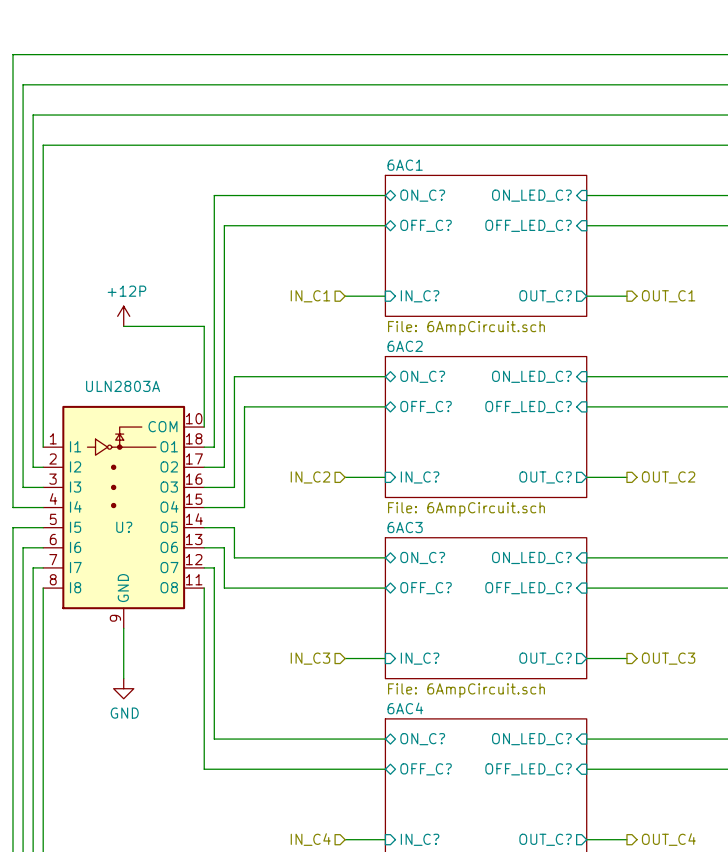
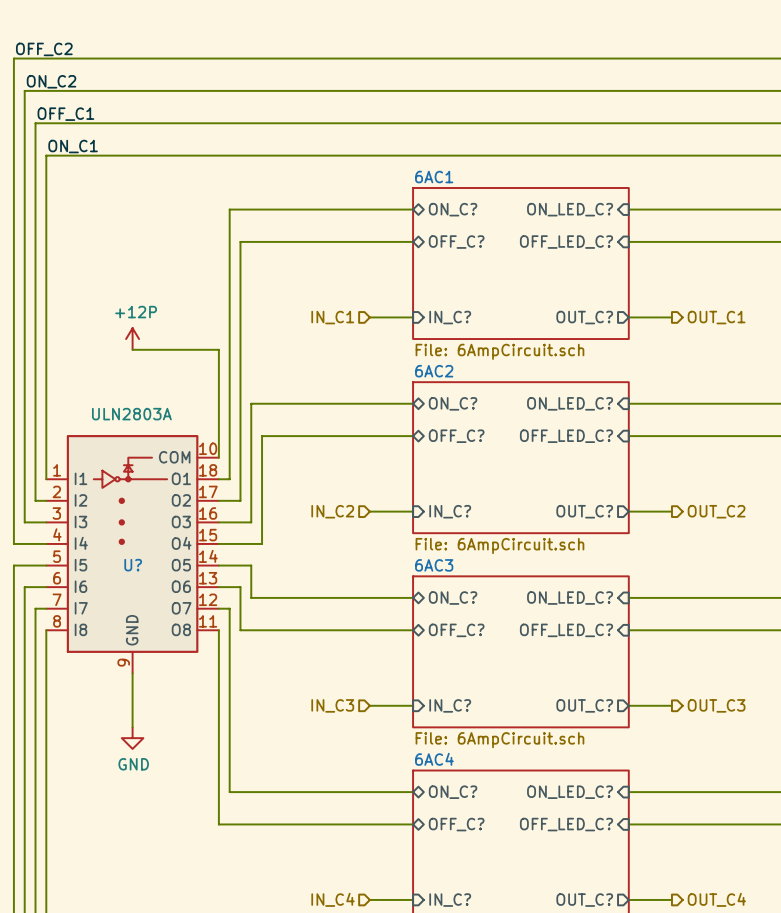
label: none -> OFF_C2 (44, 49)
label: none -> ON_C2 (51, 81)
label: none -> OFF_C1 (65, 114)
label: none -> ON_C1 (73, 146)

